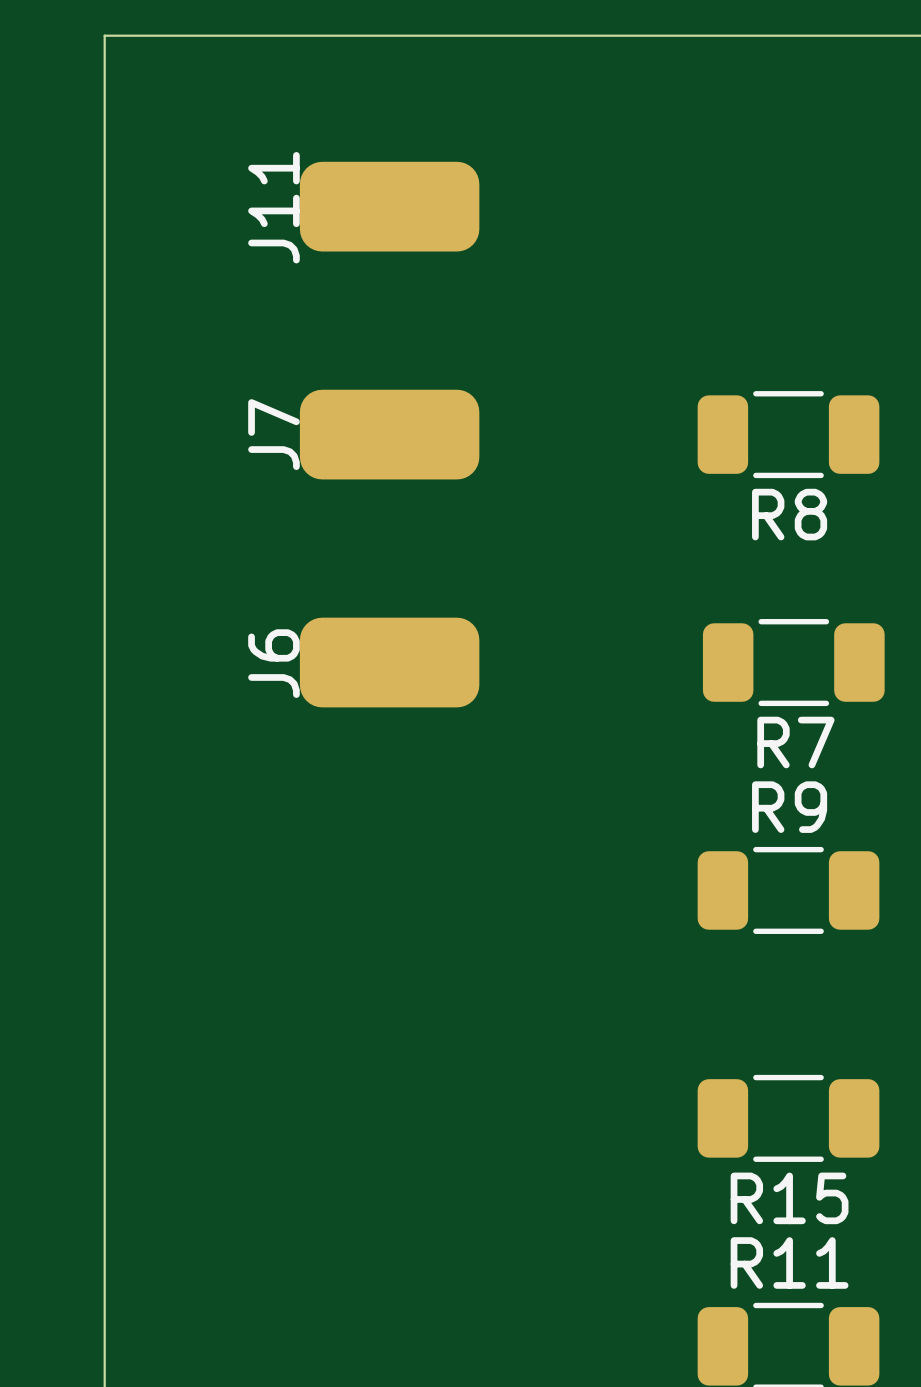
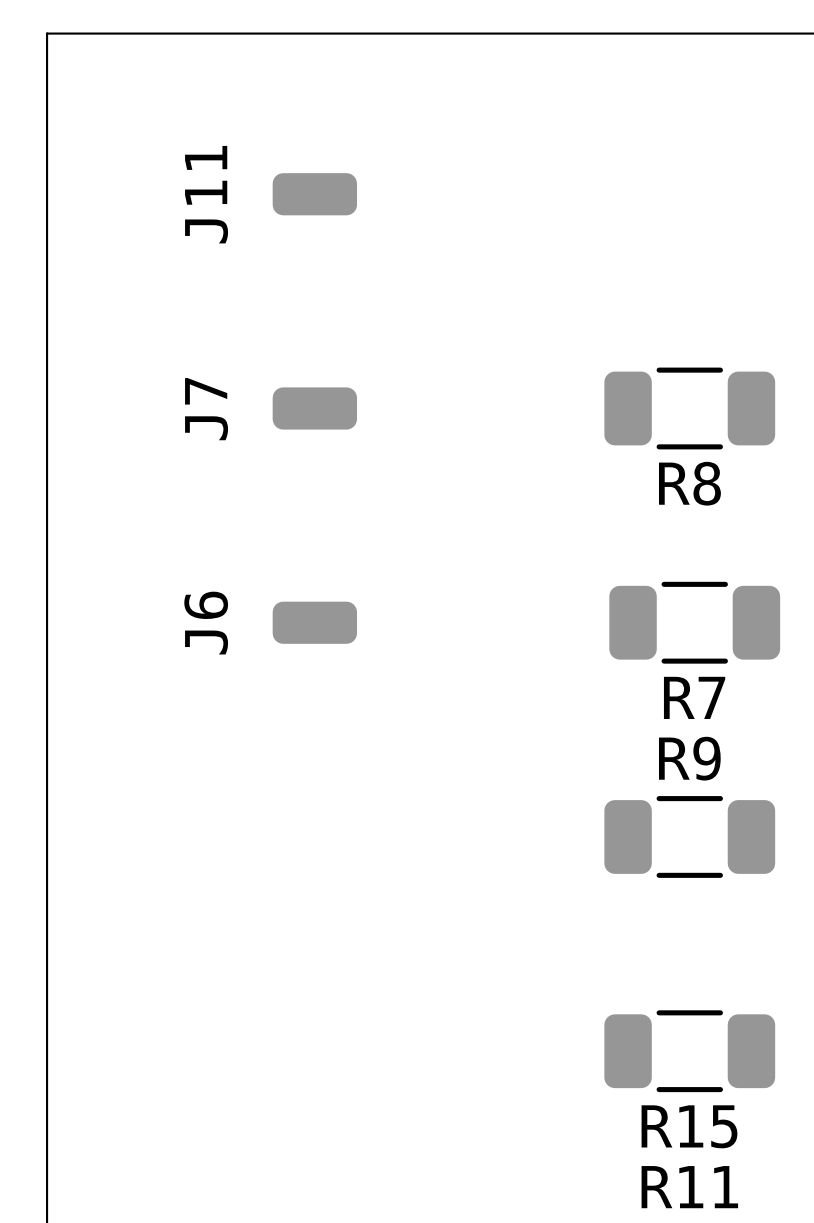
J11 footprint: [299, 161, 480, 252] -> [272, 173, 358, 216]
J7 footprint: [299, 389, 480, 480] -> [272, 387, 358, 430]
J6 footprint: [299, 617, 480, 708] -> [272, 601, 358, 644]

